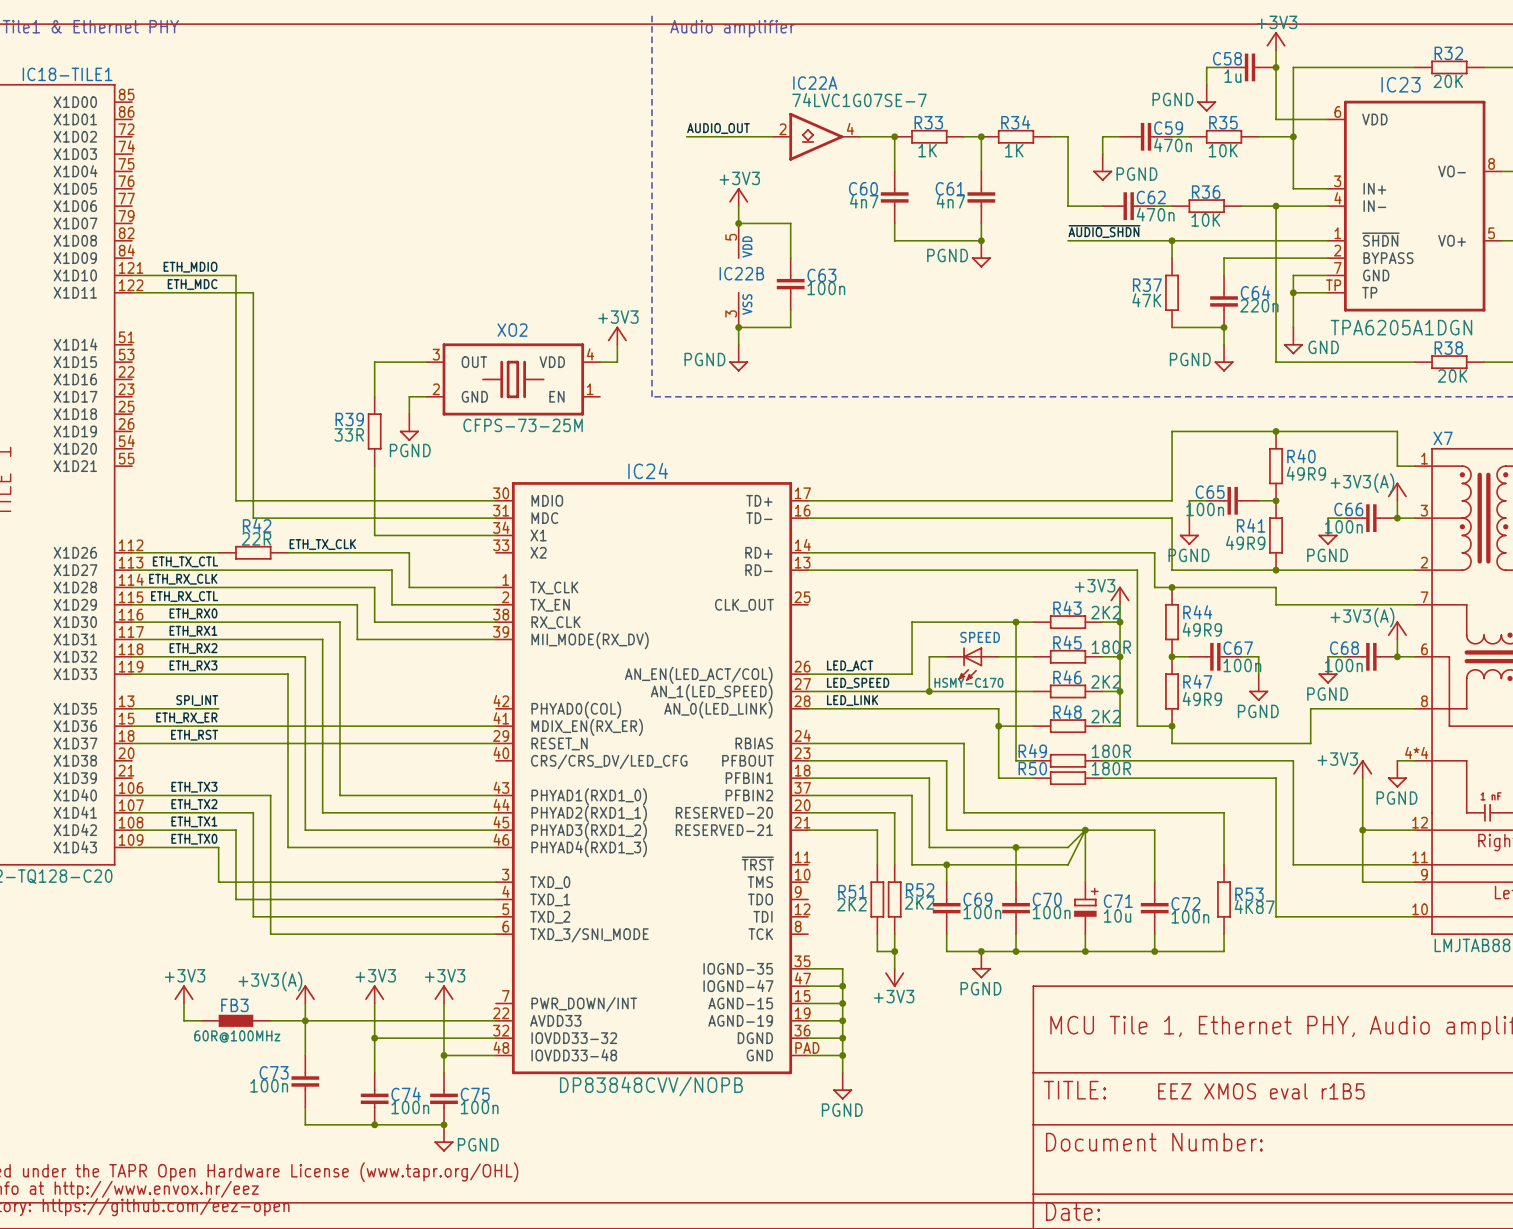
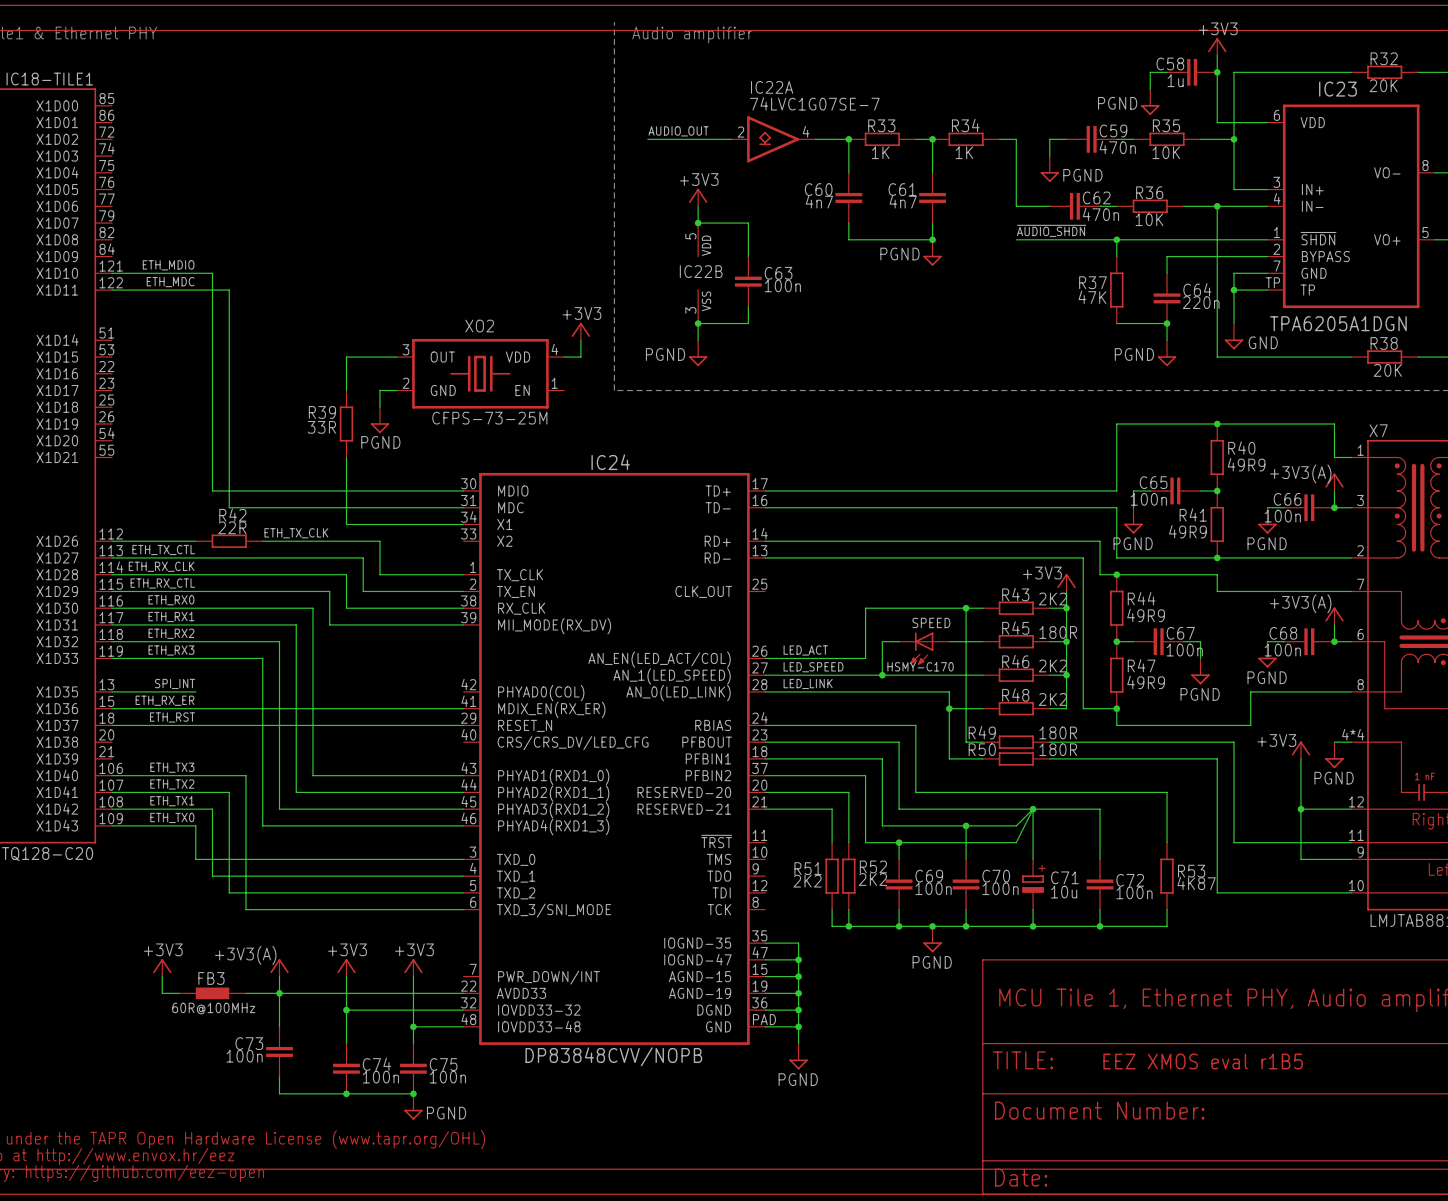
wire: (894, 951) (894, 968) -> (848, 926) (899, 926)
junction: none -> (899, 926)
power symbol: +3V3 (894, 977) -> none

